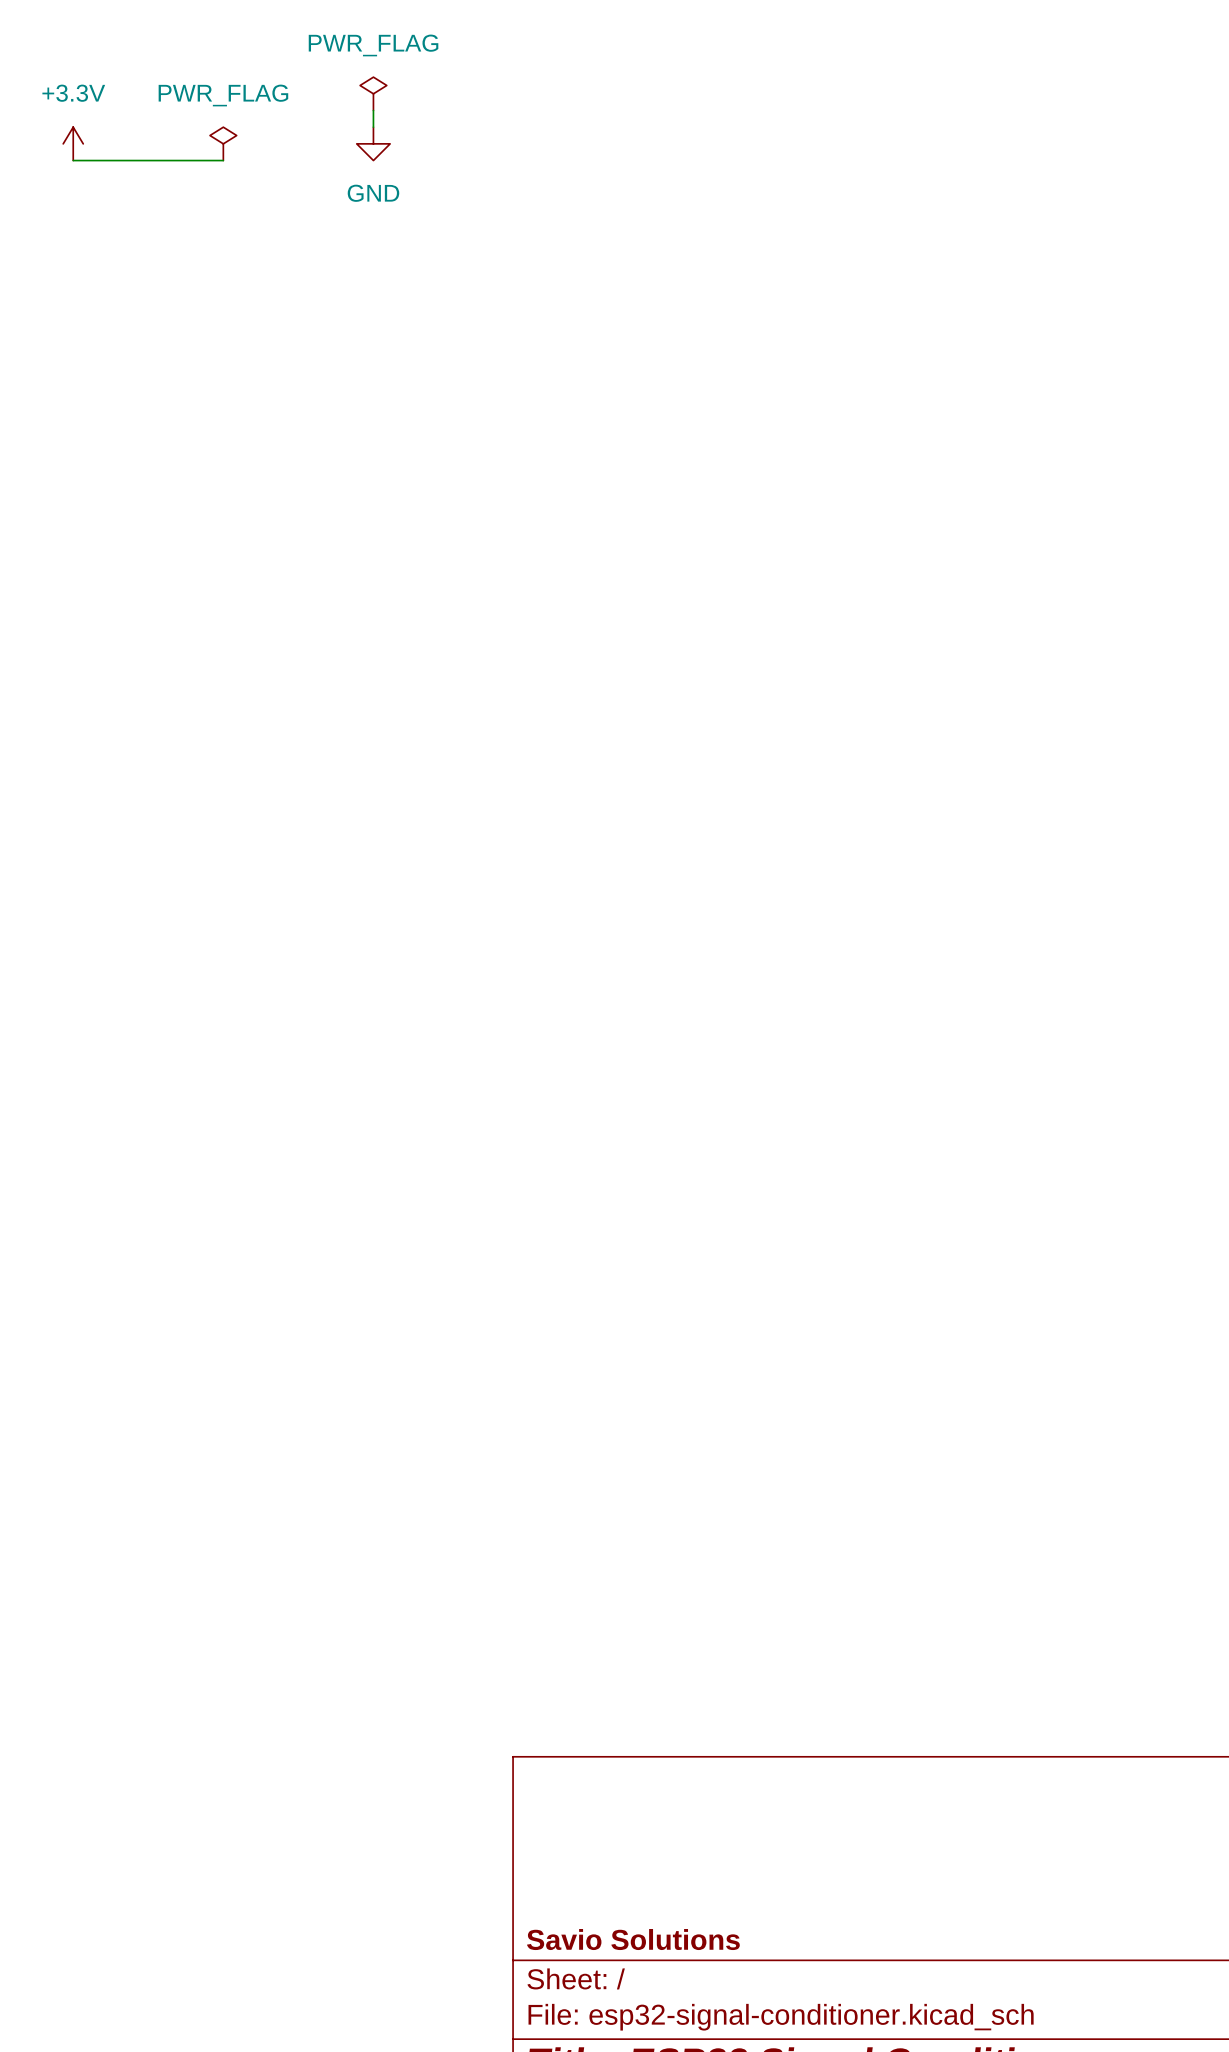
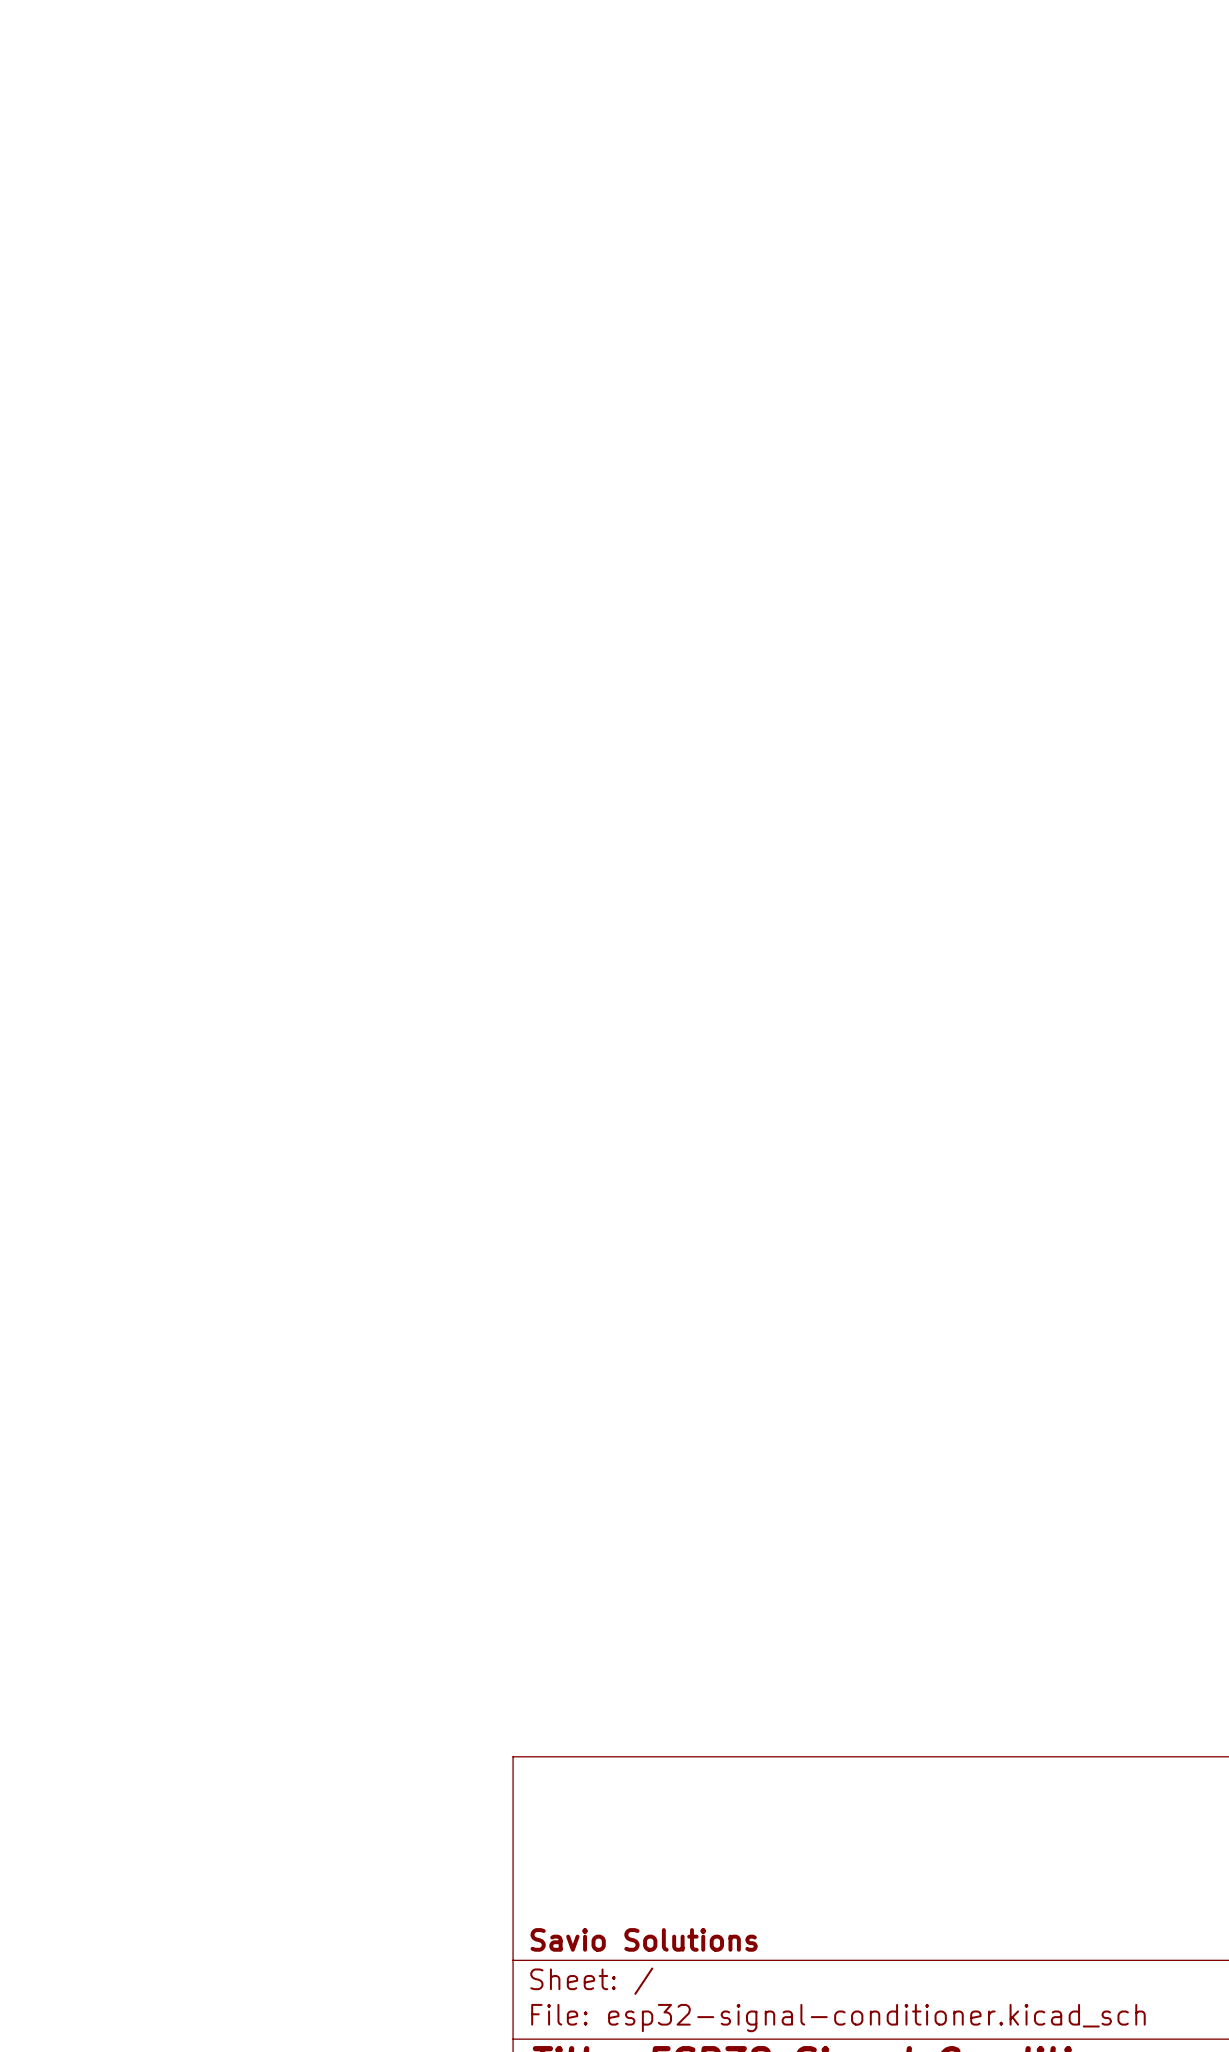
power symbol: PWR_FLAG (373, 93) -> none
wire: (373, 110) (373, 127) -> none
power symbol: +3.3V (73, 143) -> none
power symbol: PWR_FLAG (223, 143) -> none
power symbol: GND (373, 143) -> none
wire: (73, 160) (223, 160) -> none

